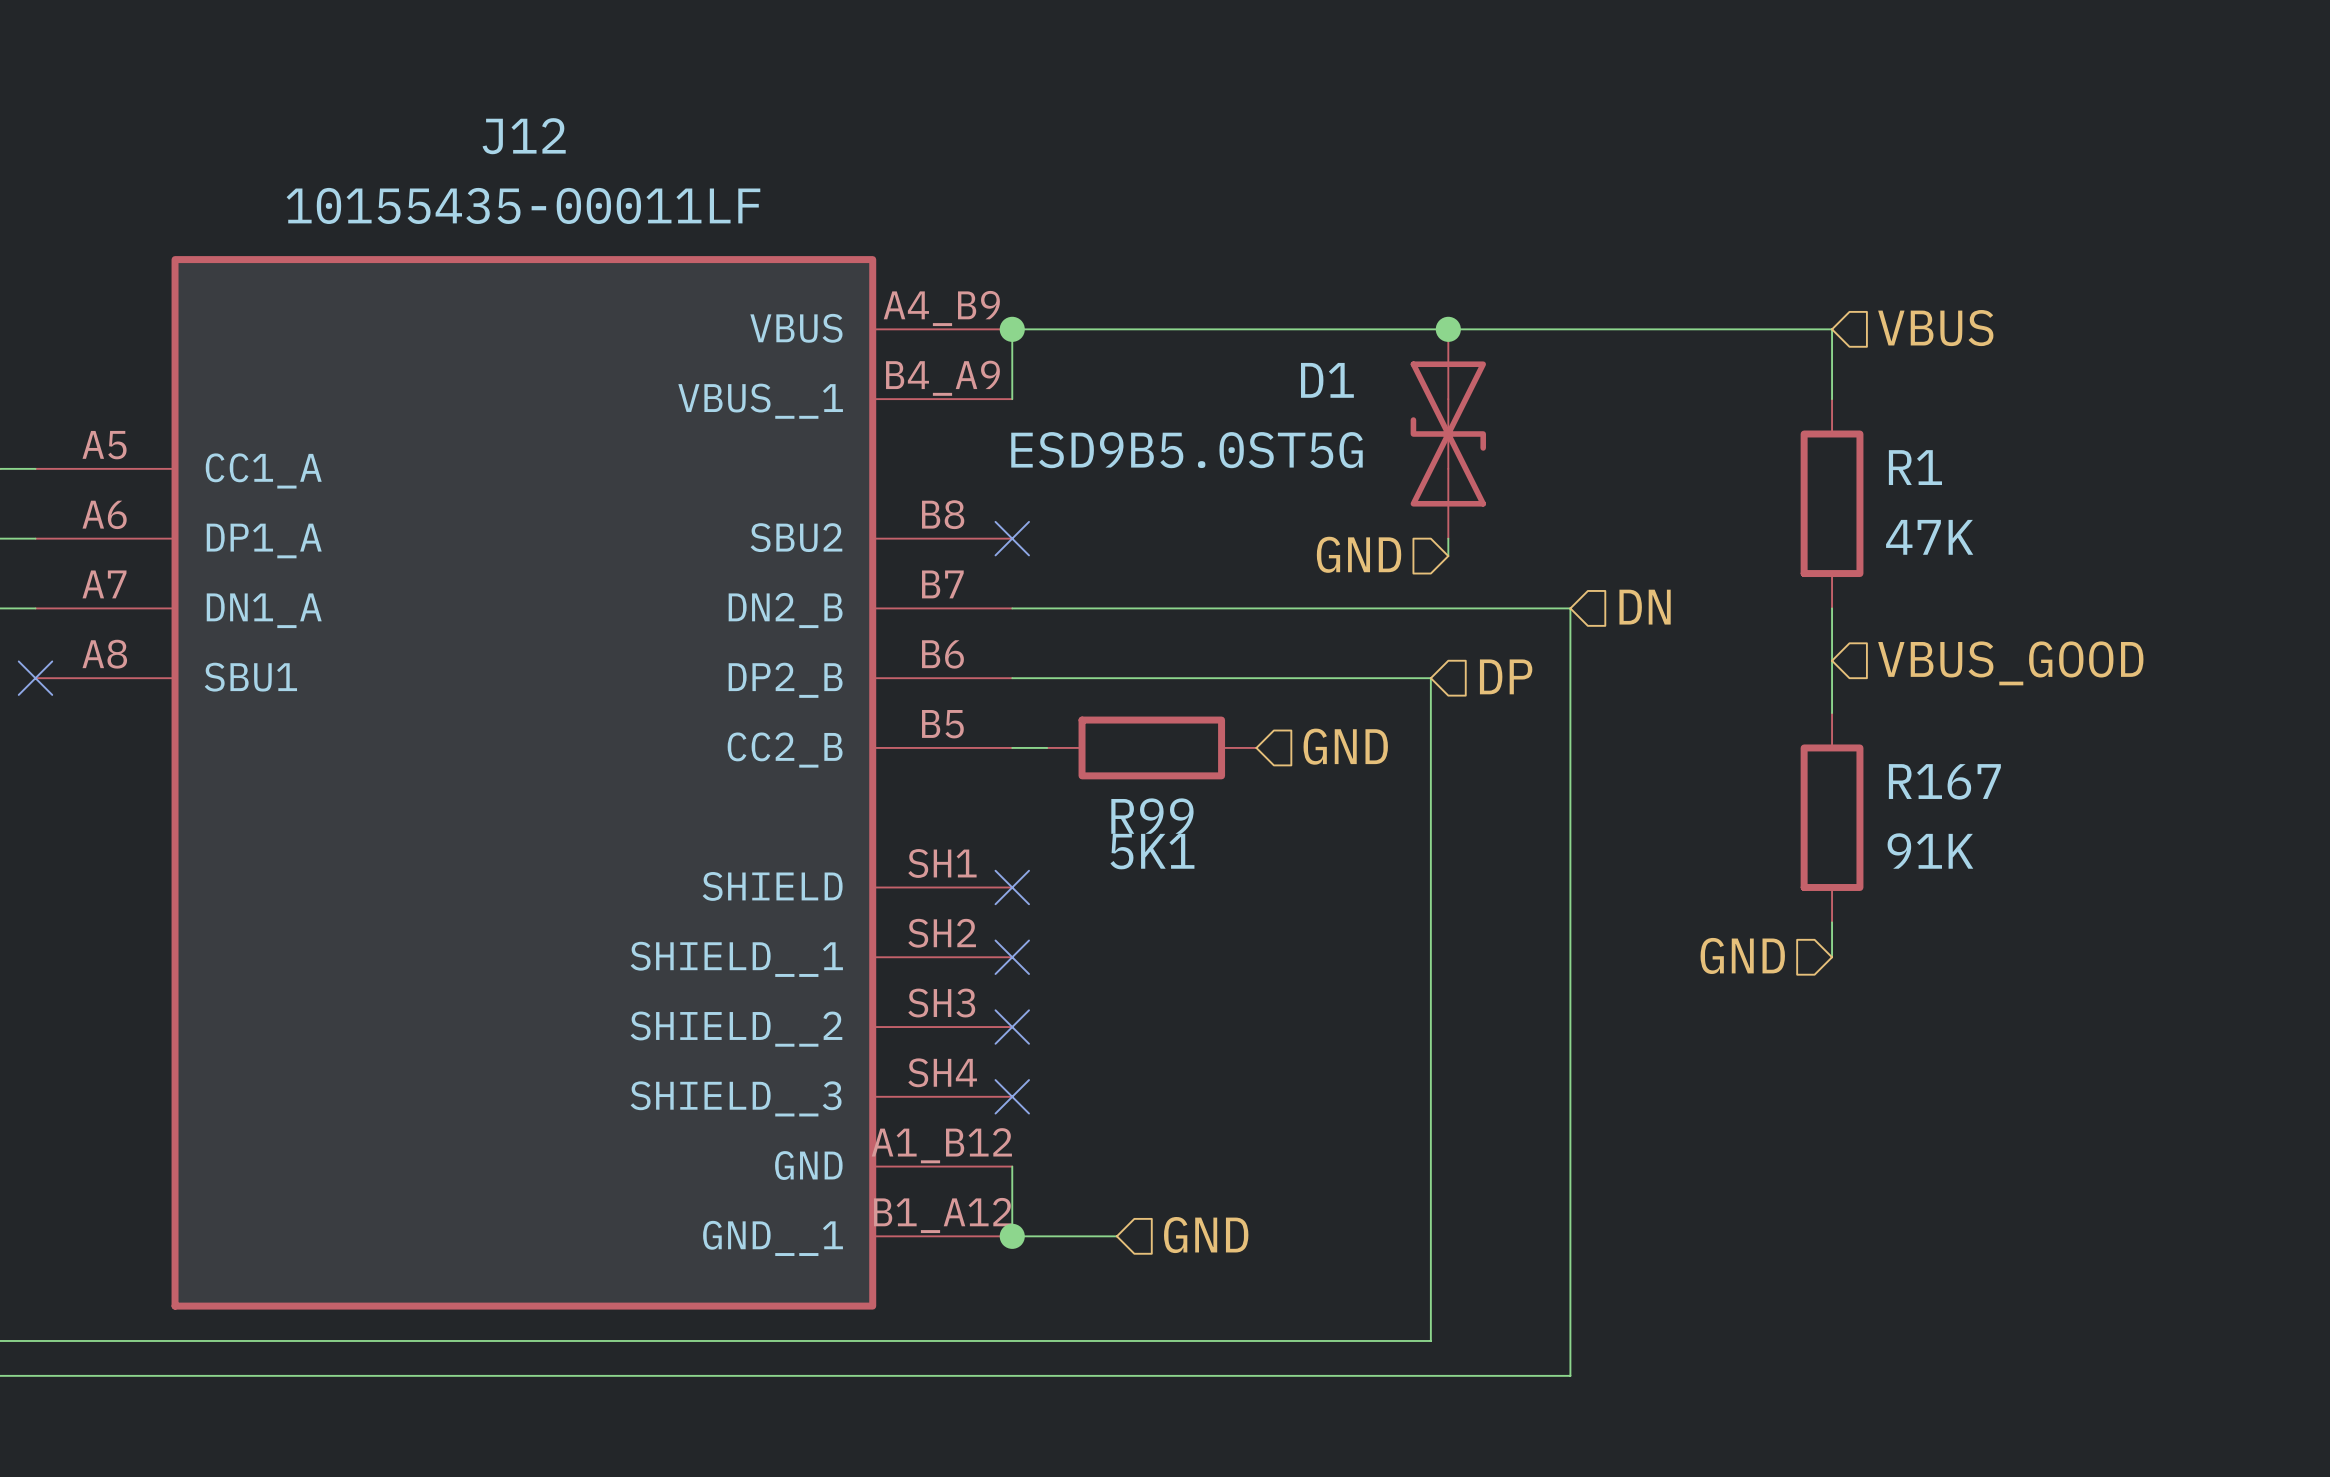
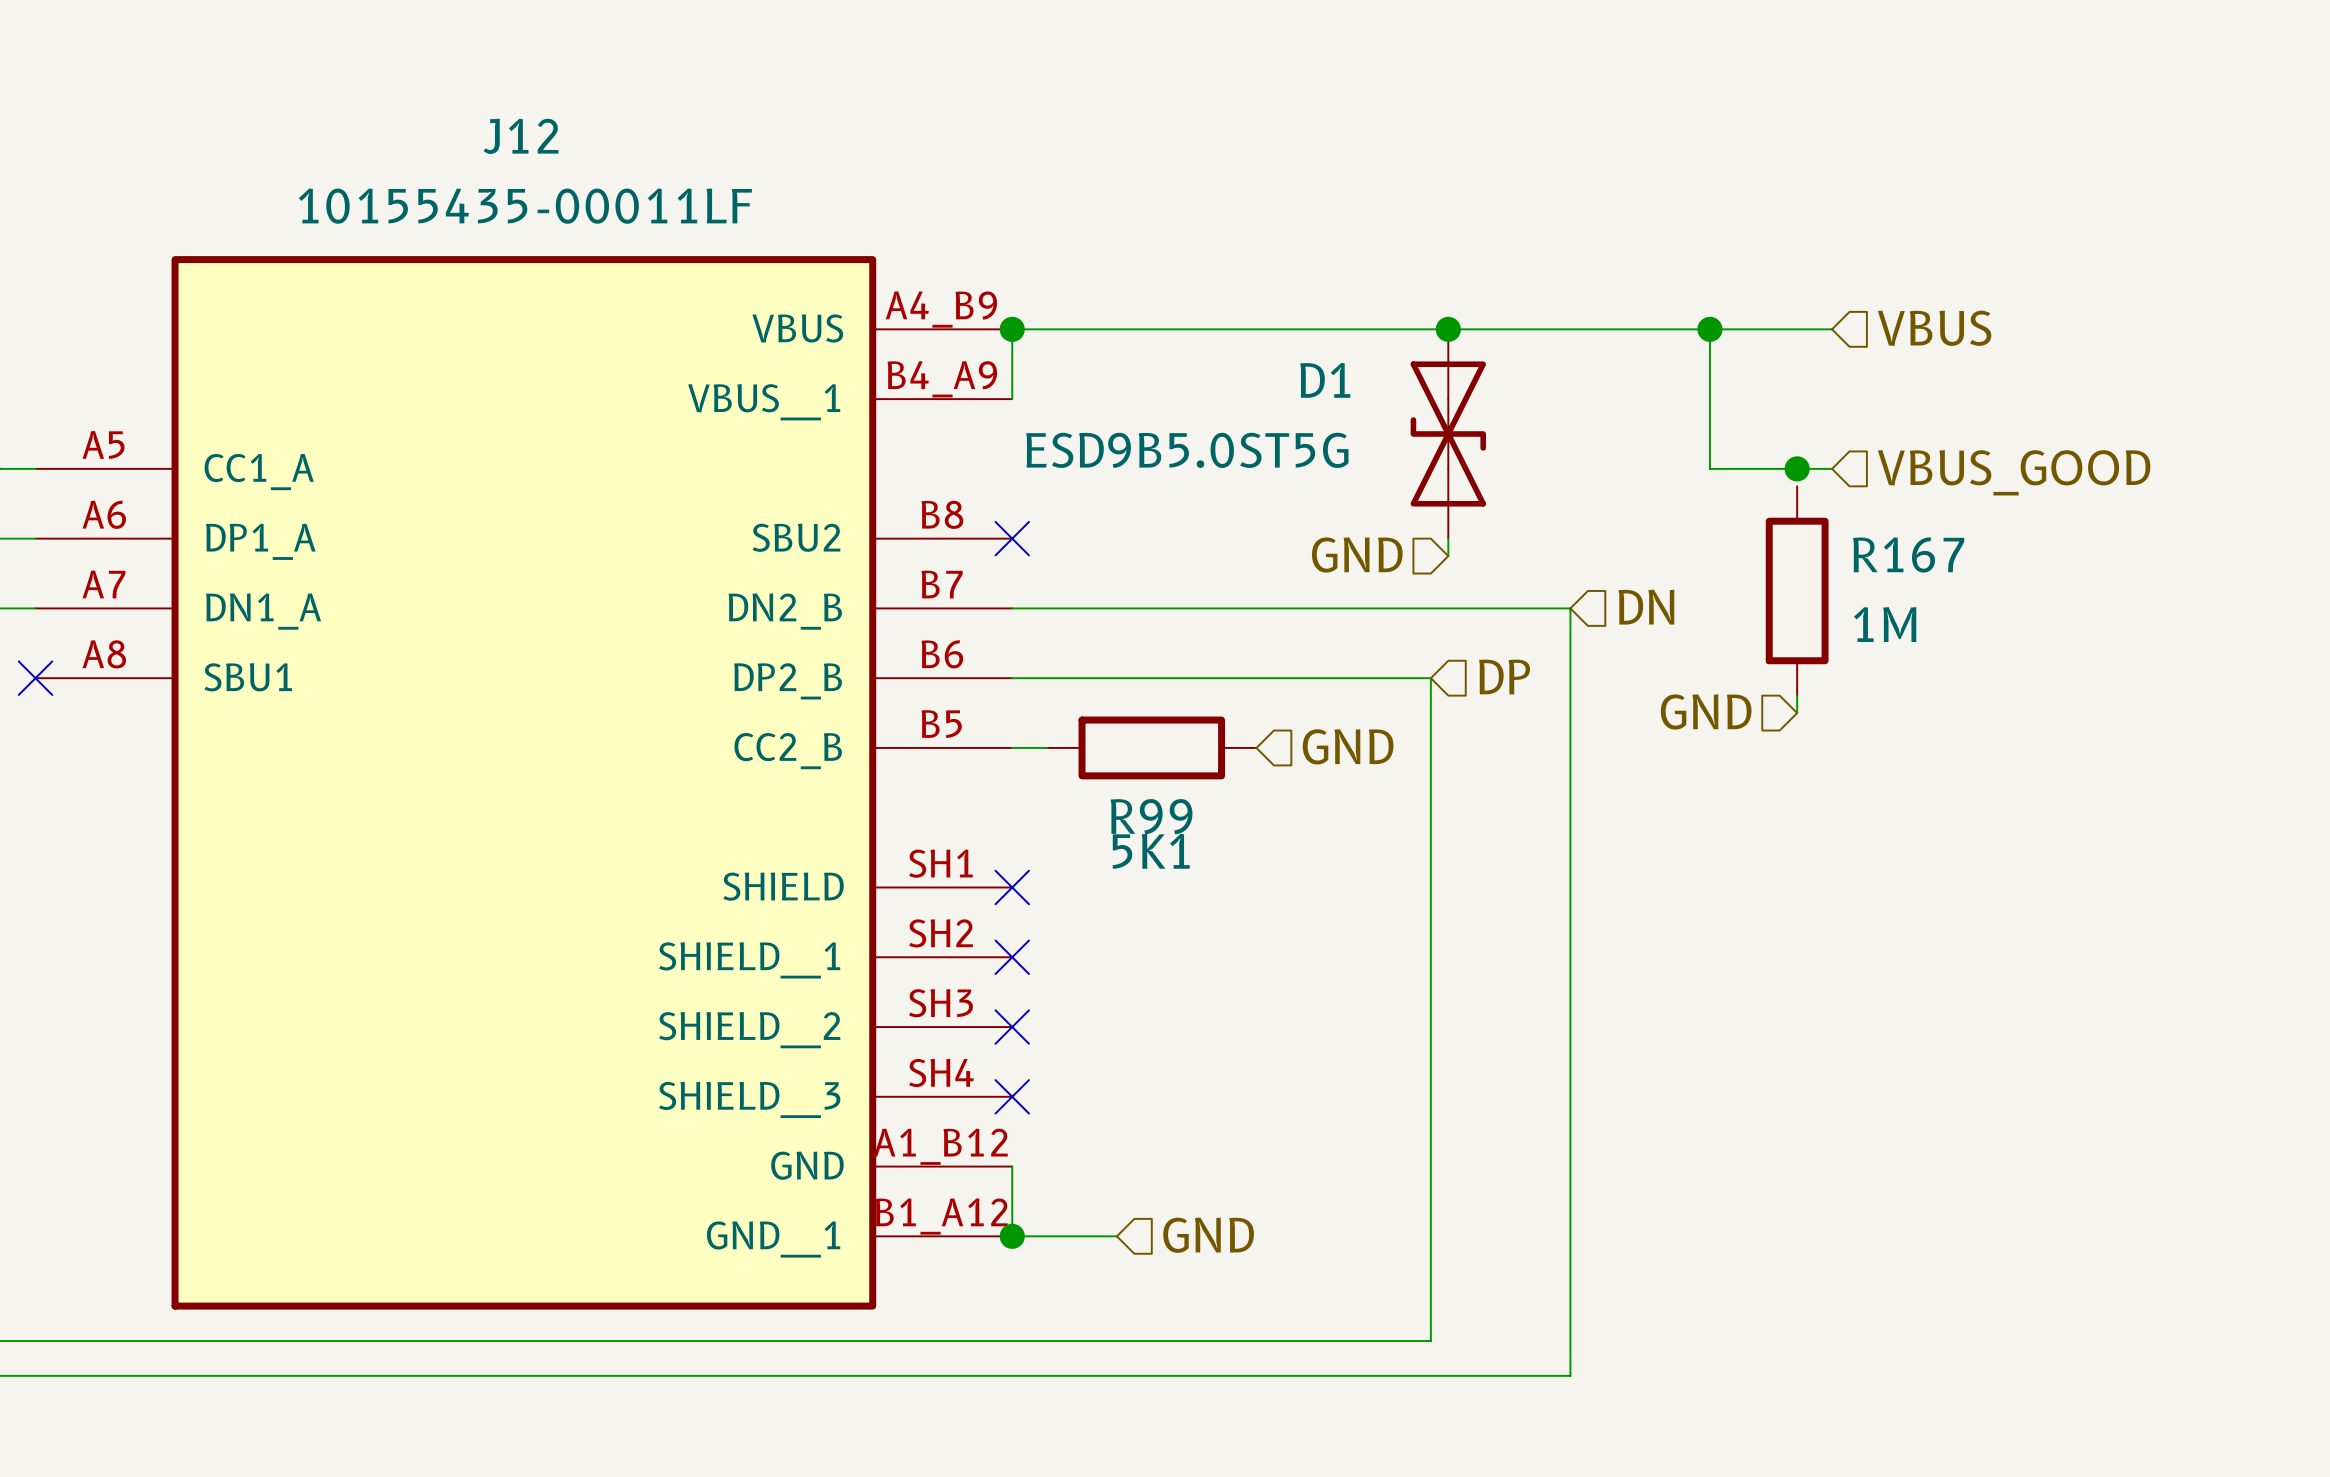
wire: none -> (1709, 329) (1709, 468) (1832, 468)
junction: none -> (1709, 329)
wire: (1832, 329) (1832, 399) -> none
junction: none -> (1797, 468)
R1: 47K (1832, 503) -> none
wire: (1832, 608) (1832, 713) -> none
hierarchical label position: VBUS_GOOD (2010, 663) -> VBUS_GOOD (2014, 472)
wire: none -> (1797, 695) (1797, 713)
R167 position: (1832, 817) -> (1797, 590)
R167 value: 91K (1930, 851) -> 1M (1885, 624)
wire: (1832, 922) (1832, 957) -> none
hierarchical label position: GND (1742, 955) -> GND (1706, 711)

